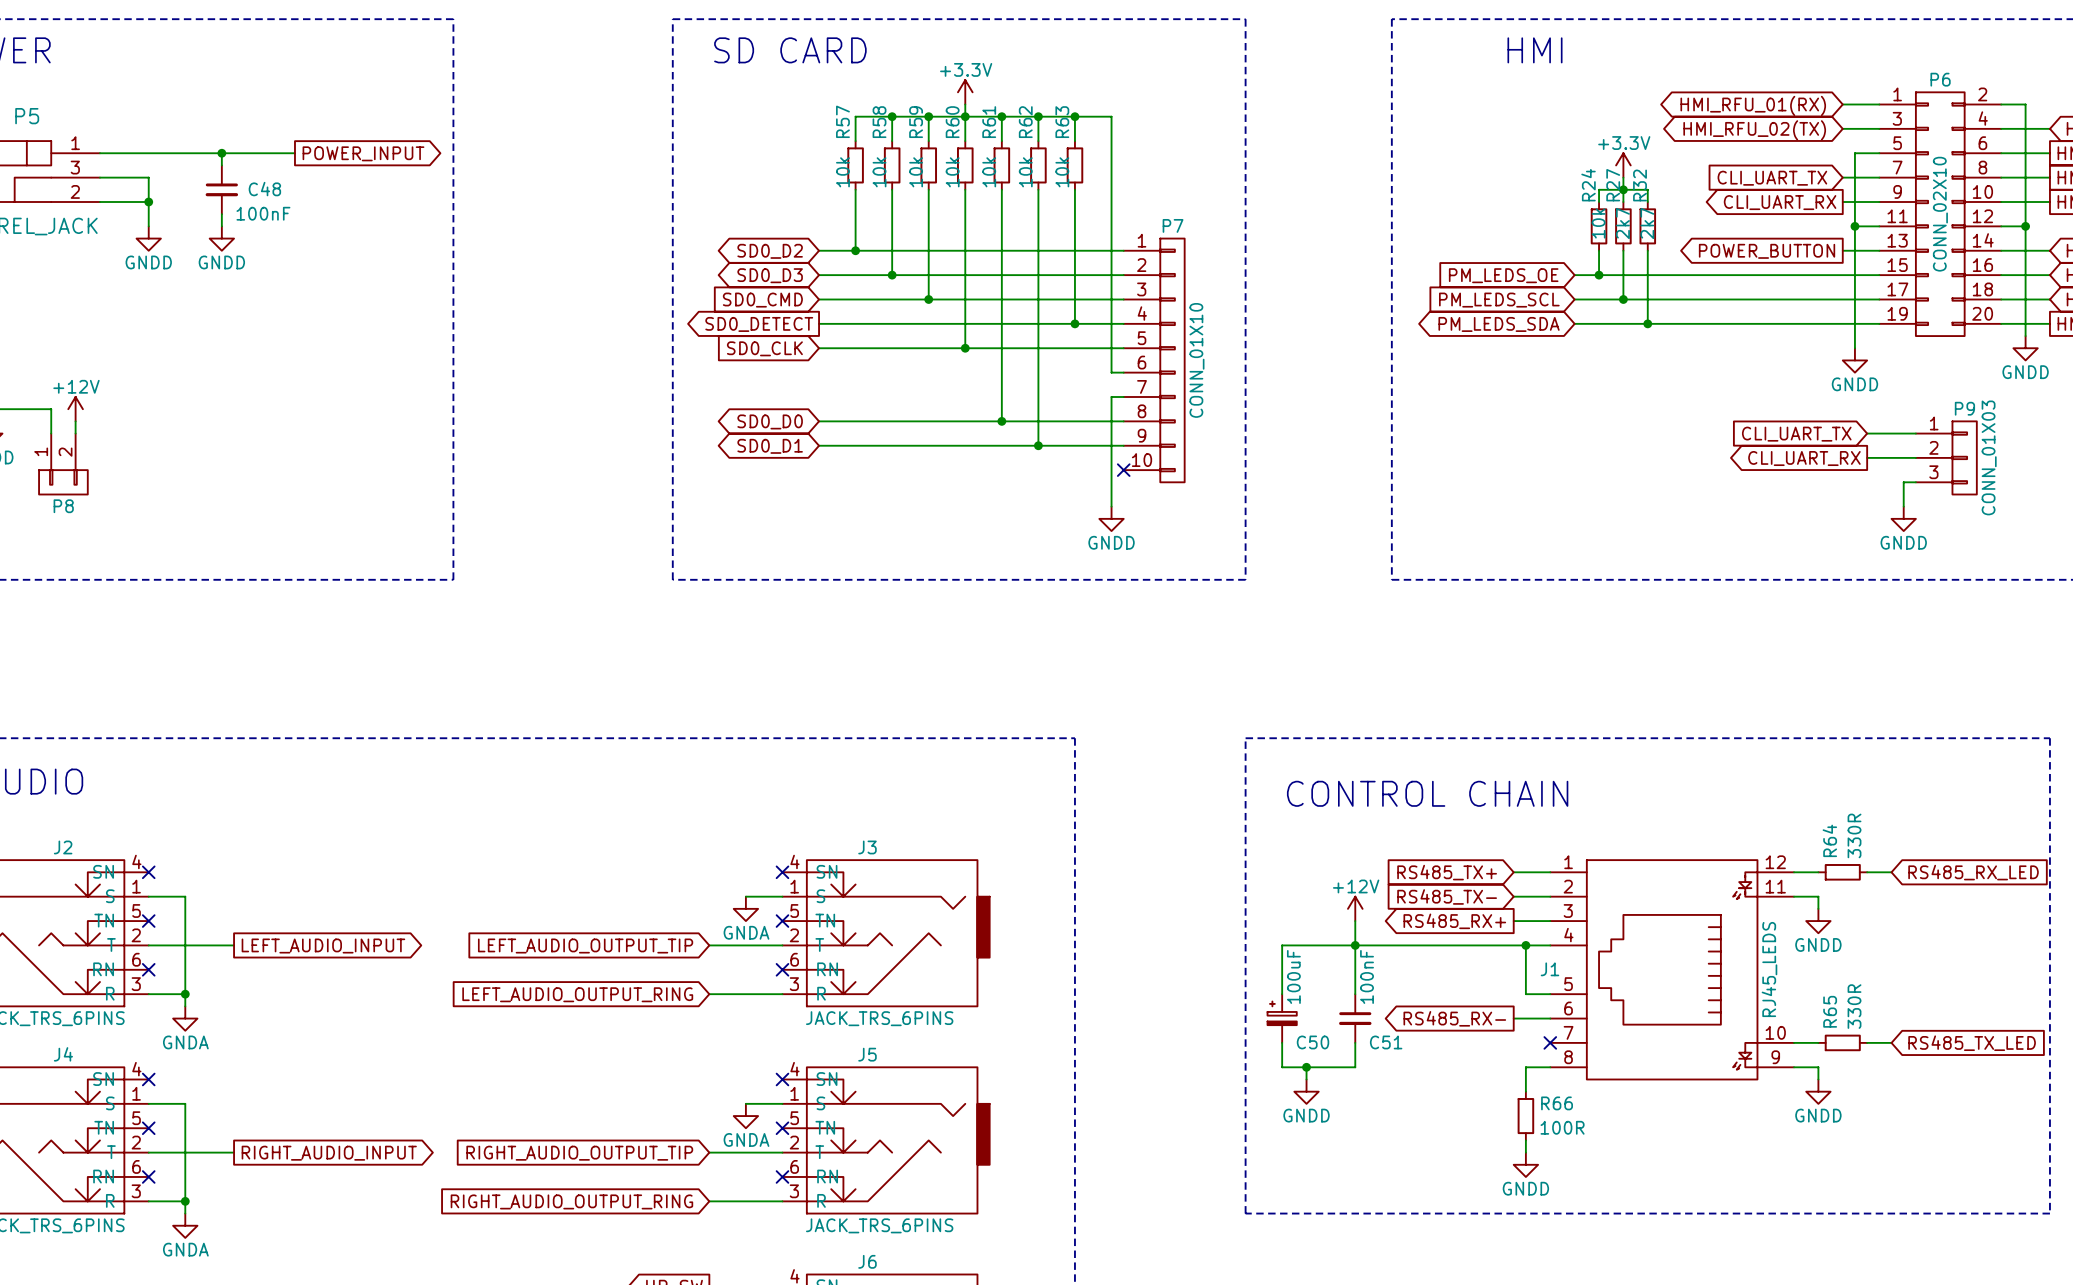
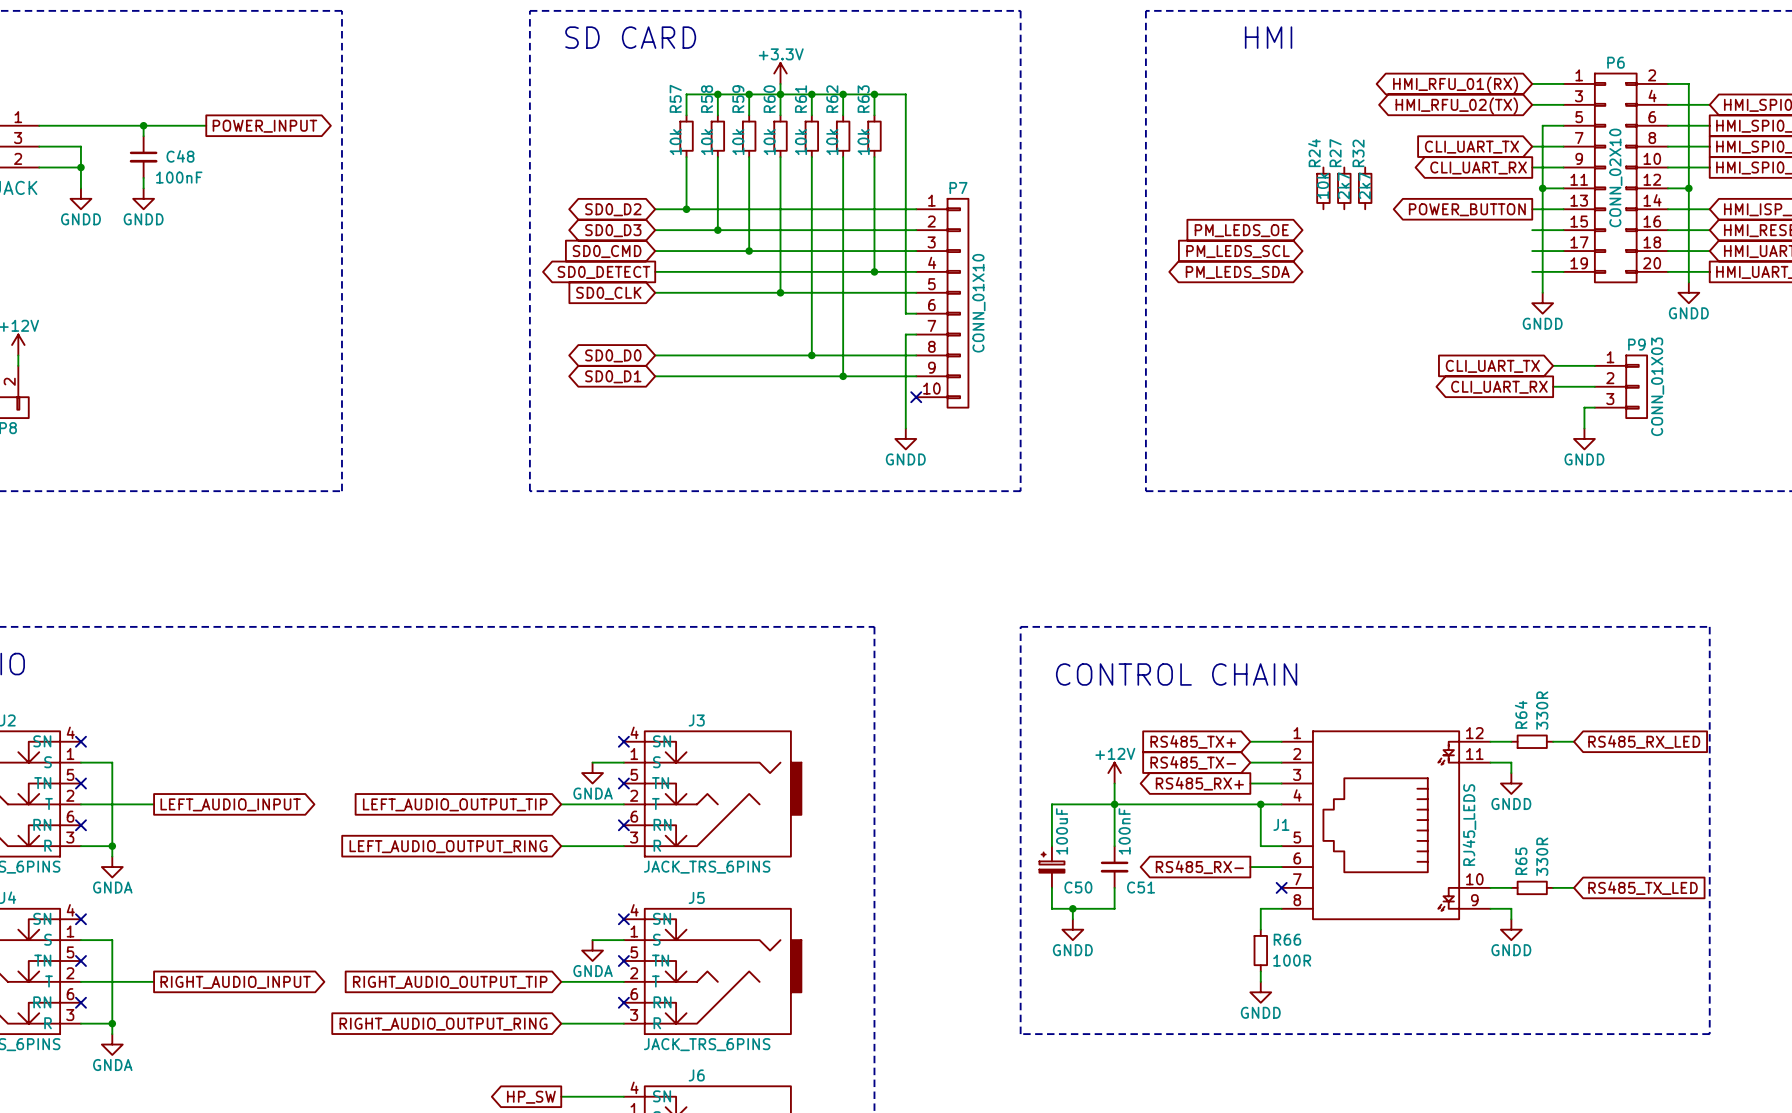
power symbol: +3.3V (1623, 165) -> none
wire: (1623, 177) (1623, 201) -> none
junction: (1623, 189) -> none
wire: (1599, 201) (1599, 189) (1647, 189) (1647, 201) -> none
wire: (1599, 250) (1599, 275) -> none
wire: (1623, 250) (1623, 299) -> none
wire: (1647, 250) (1647, 323) -> none
wire: (1574, 275) (1842, 275) -> none
junction: (1599, 275) -> none
wire: (1574, 299) (1842, 299) -> none
junction: (1623, 299) -> none
wire: (1574, 323) (1842, 323) -> none
junction: (1647, 323) -> none

